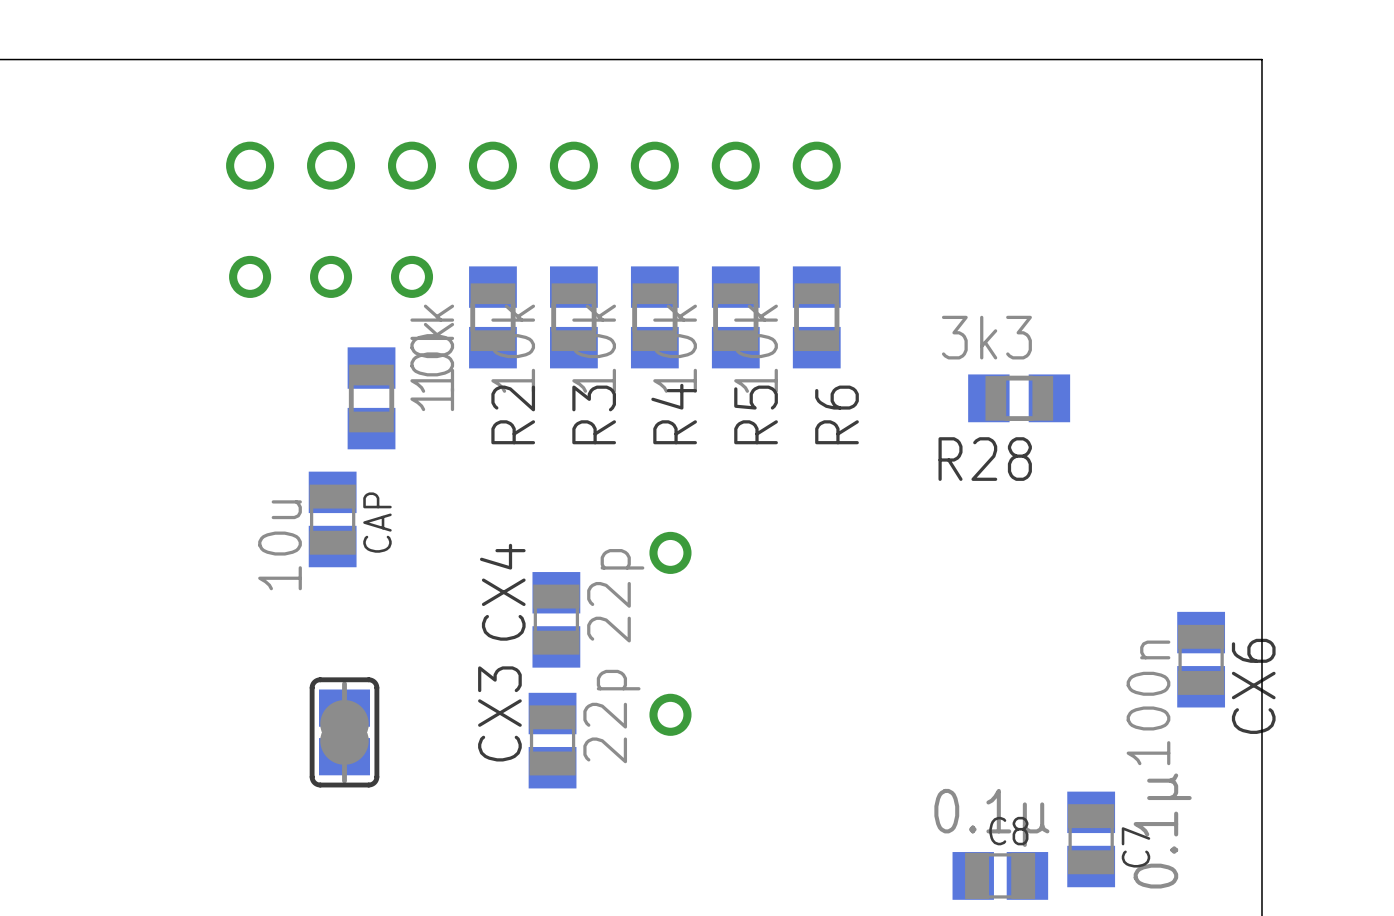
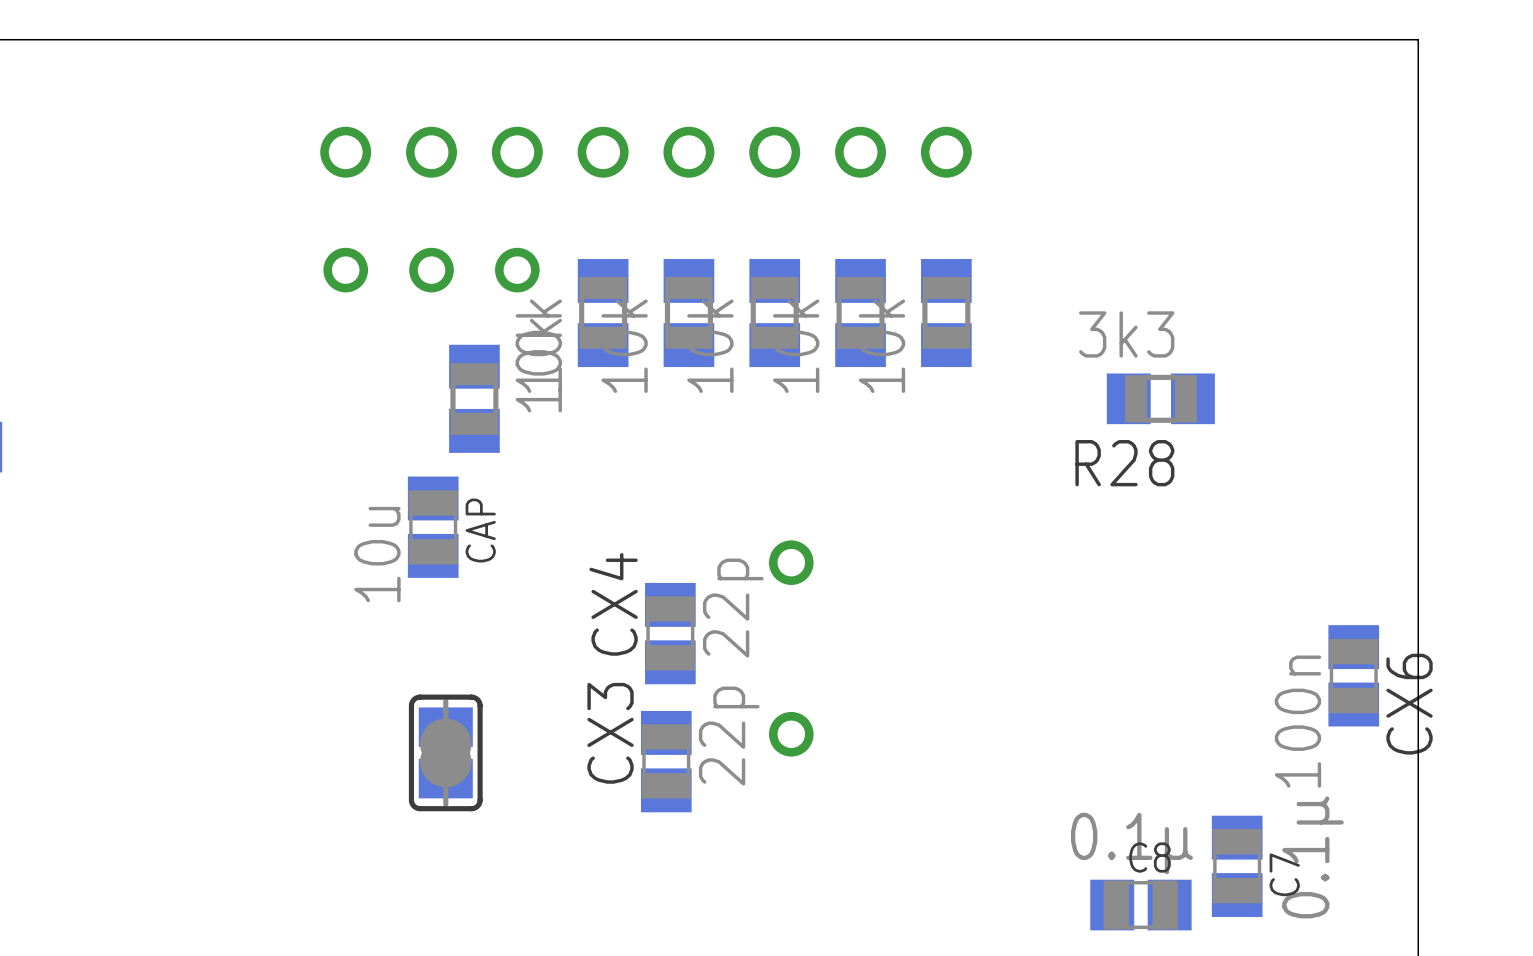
R2 name: R2 (513, 414) -> none
R3 name: R3 (594, 414) -> none
R4 name: R4 (674, 414) -> none
R5 name: R5 (756, 414) -> none
R6 name: R6 (837, 414) -> none

